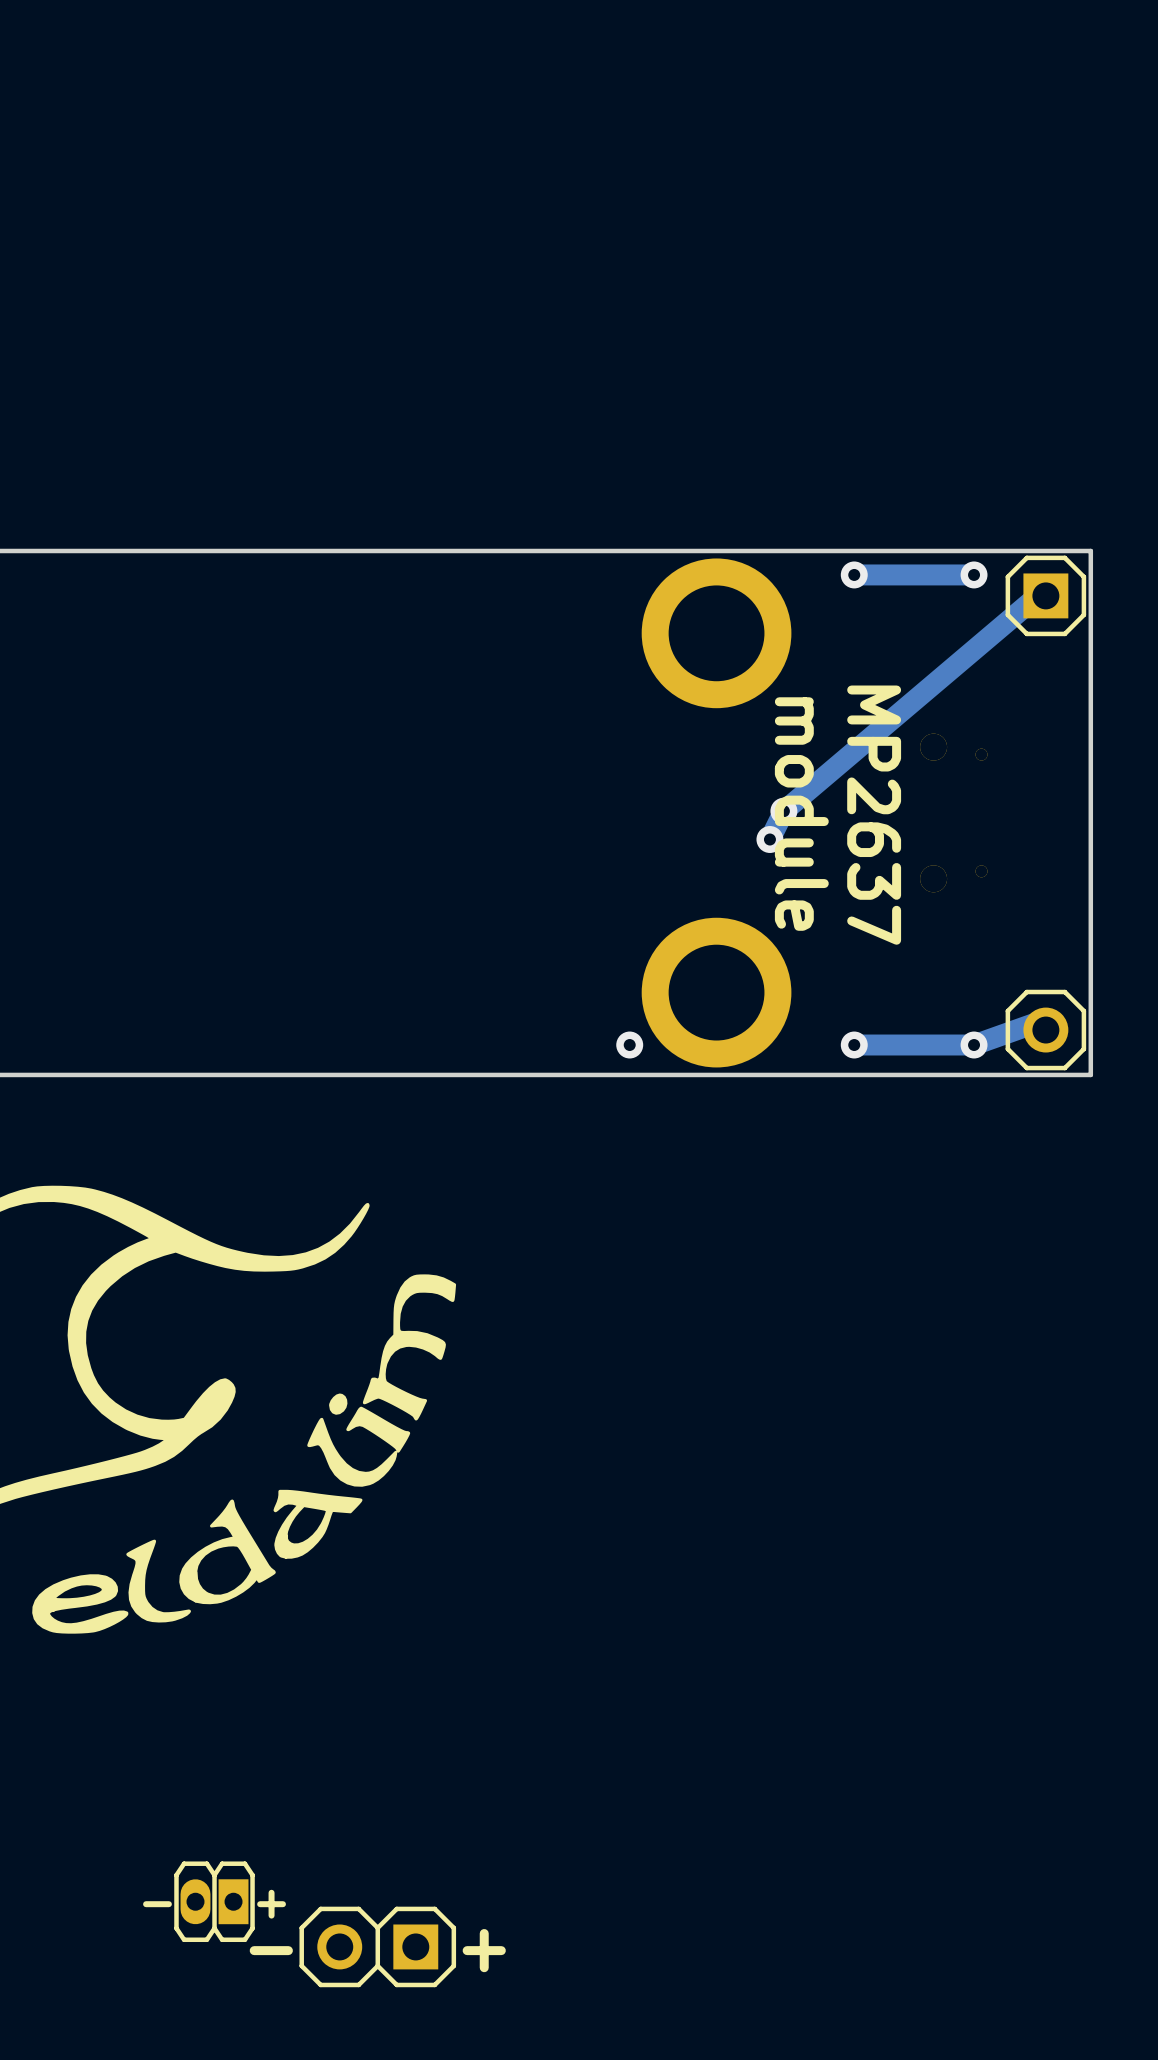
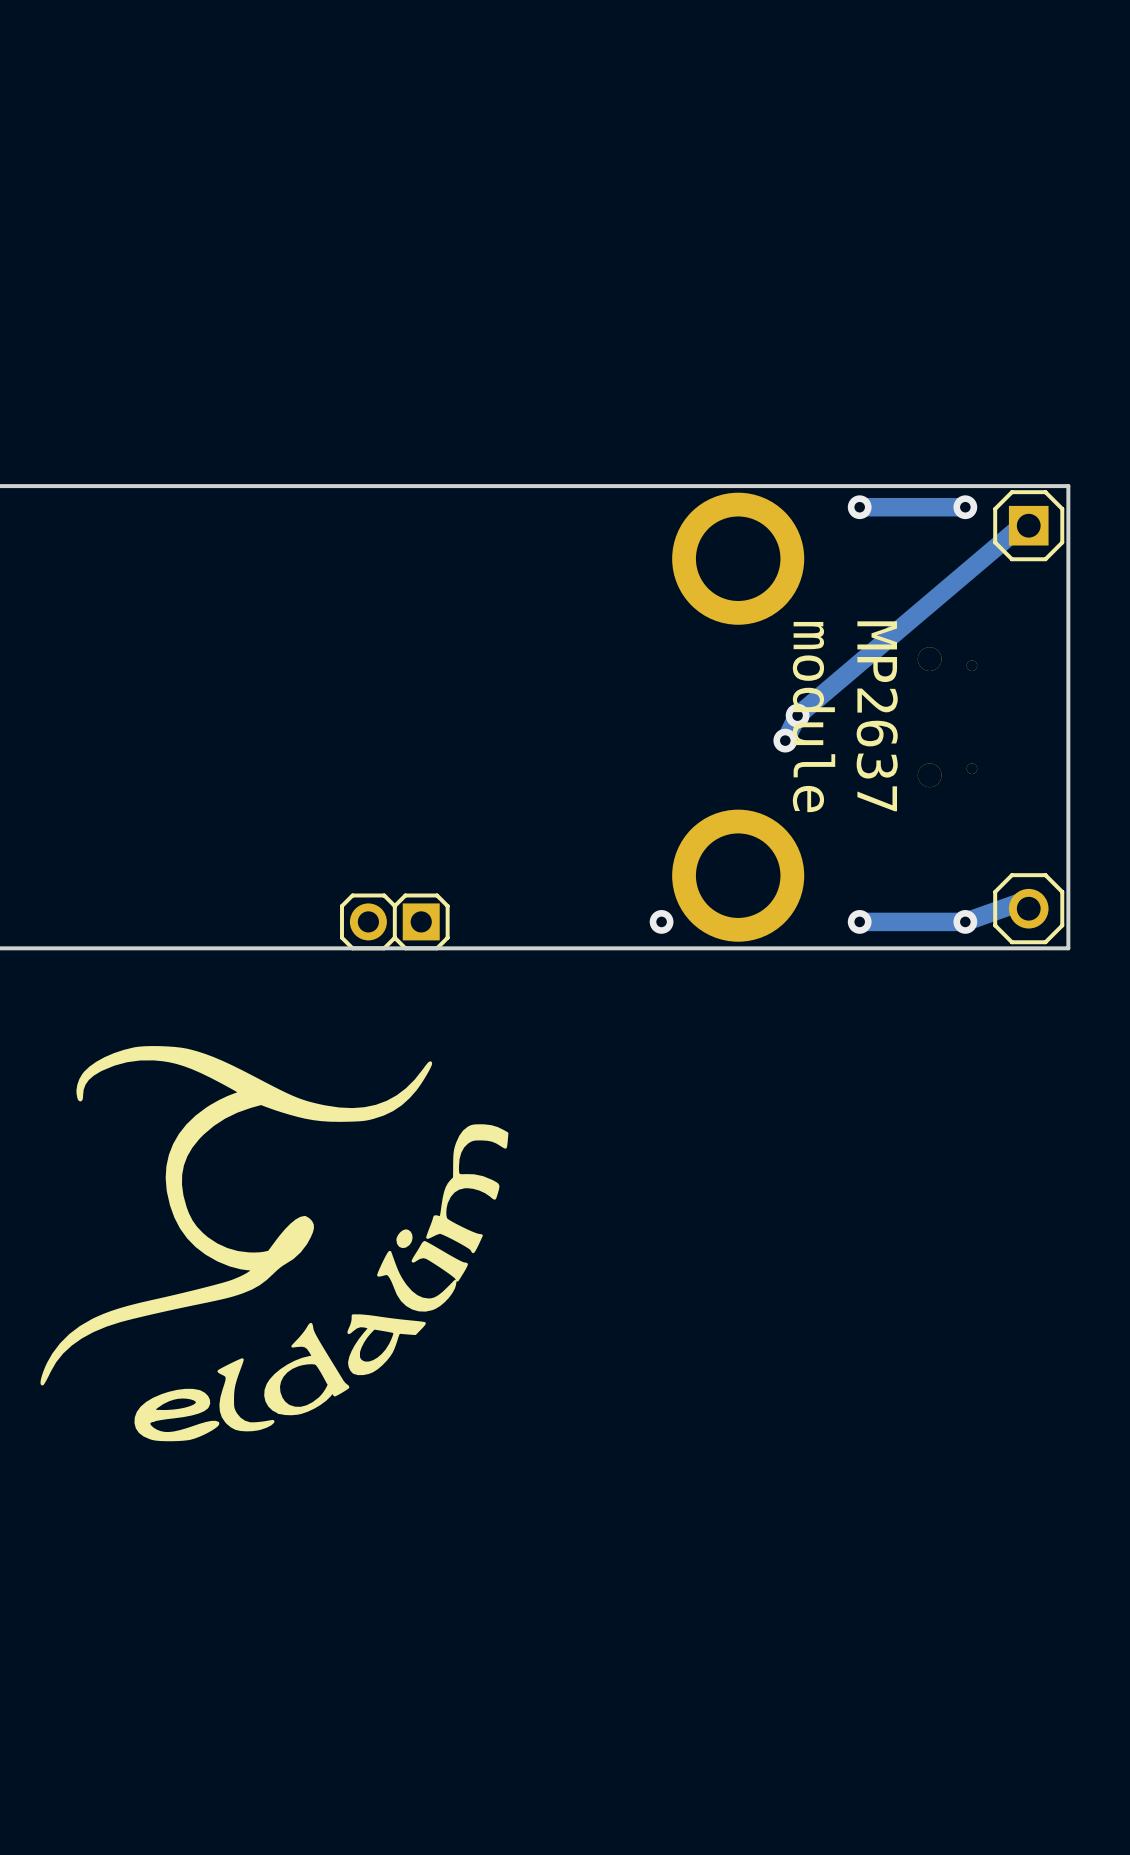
part: none -> (394, 921)
part: (214, 1901) -> none
part: (377, 1946) -> none

